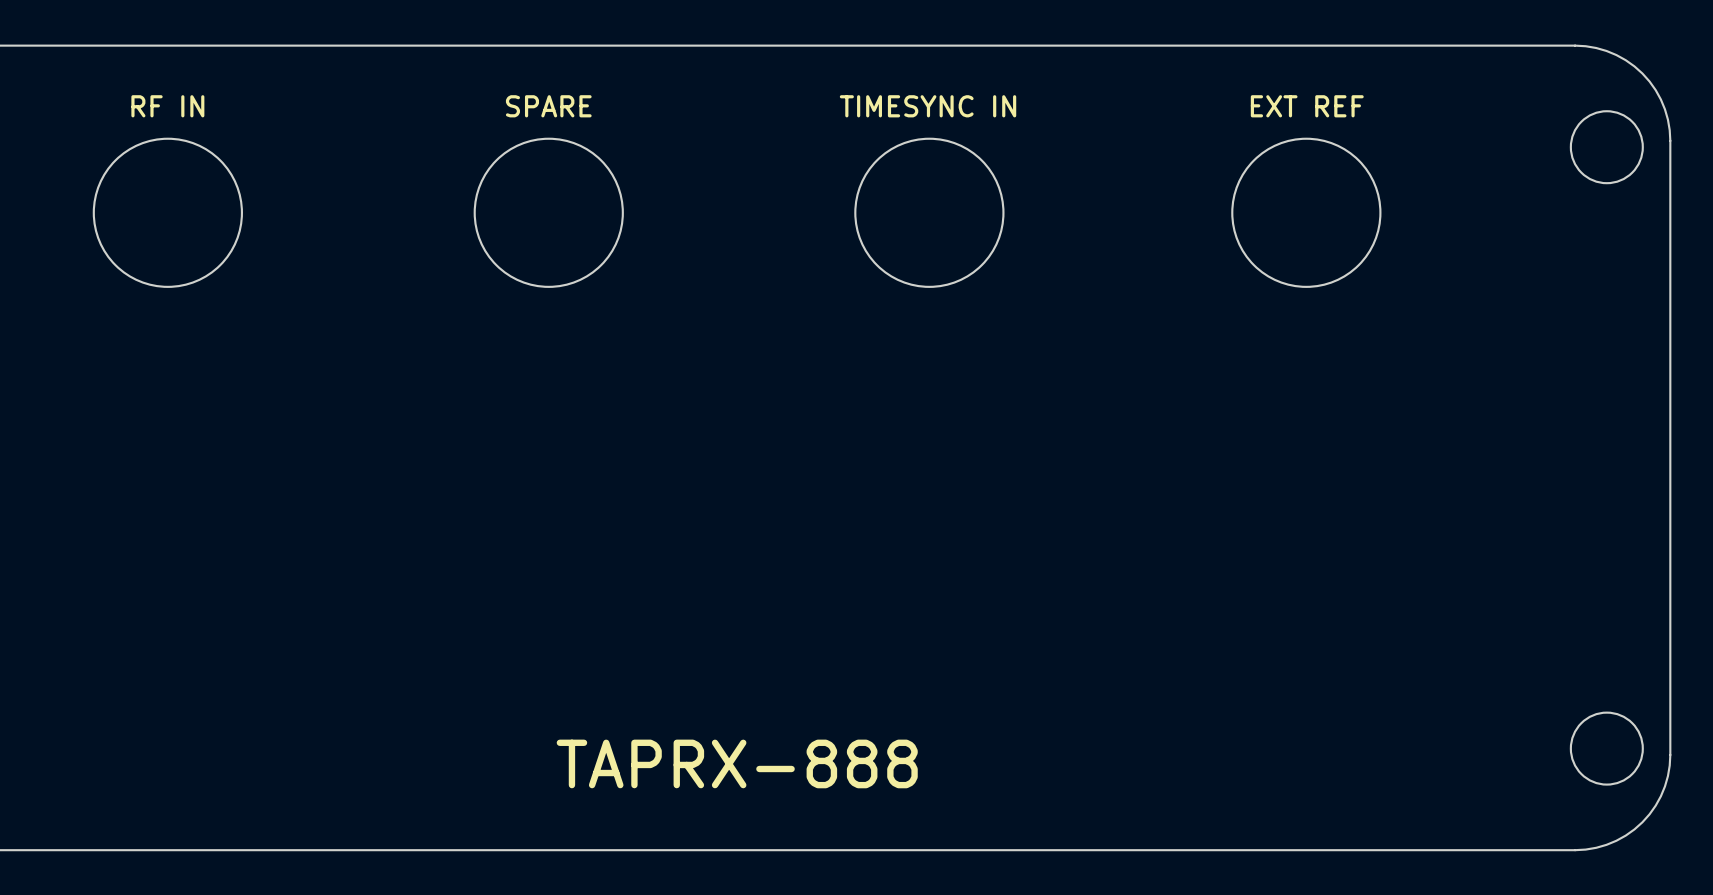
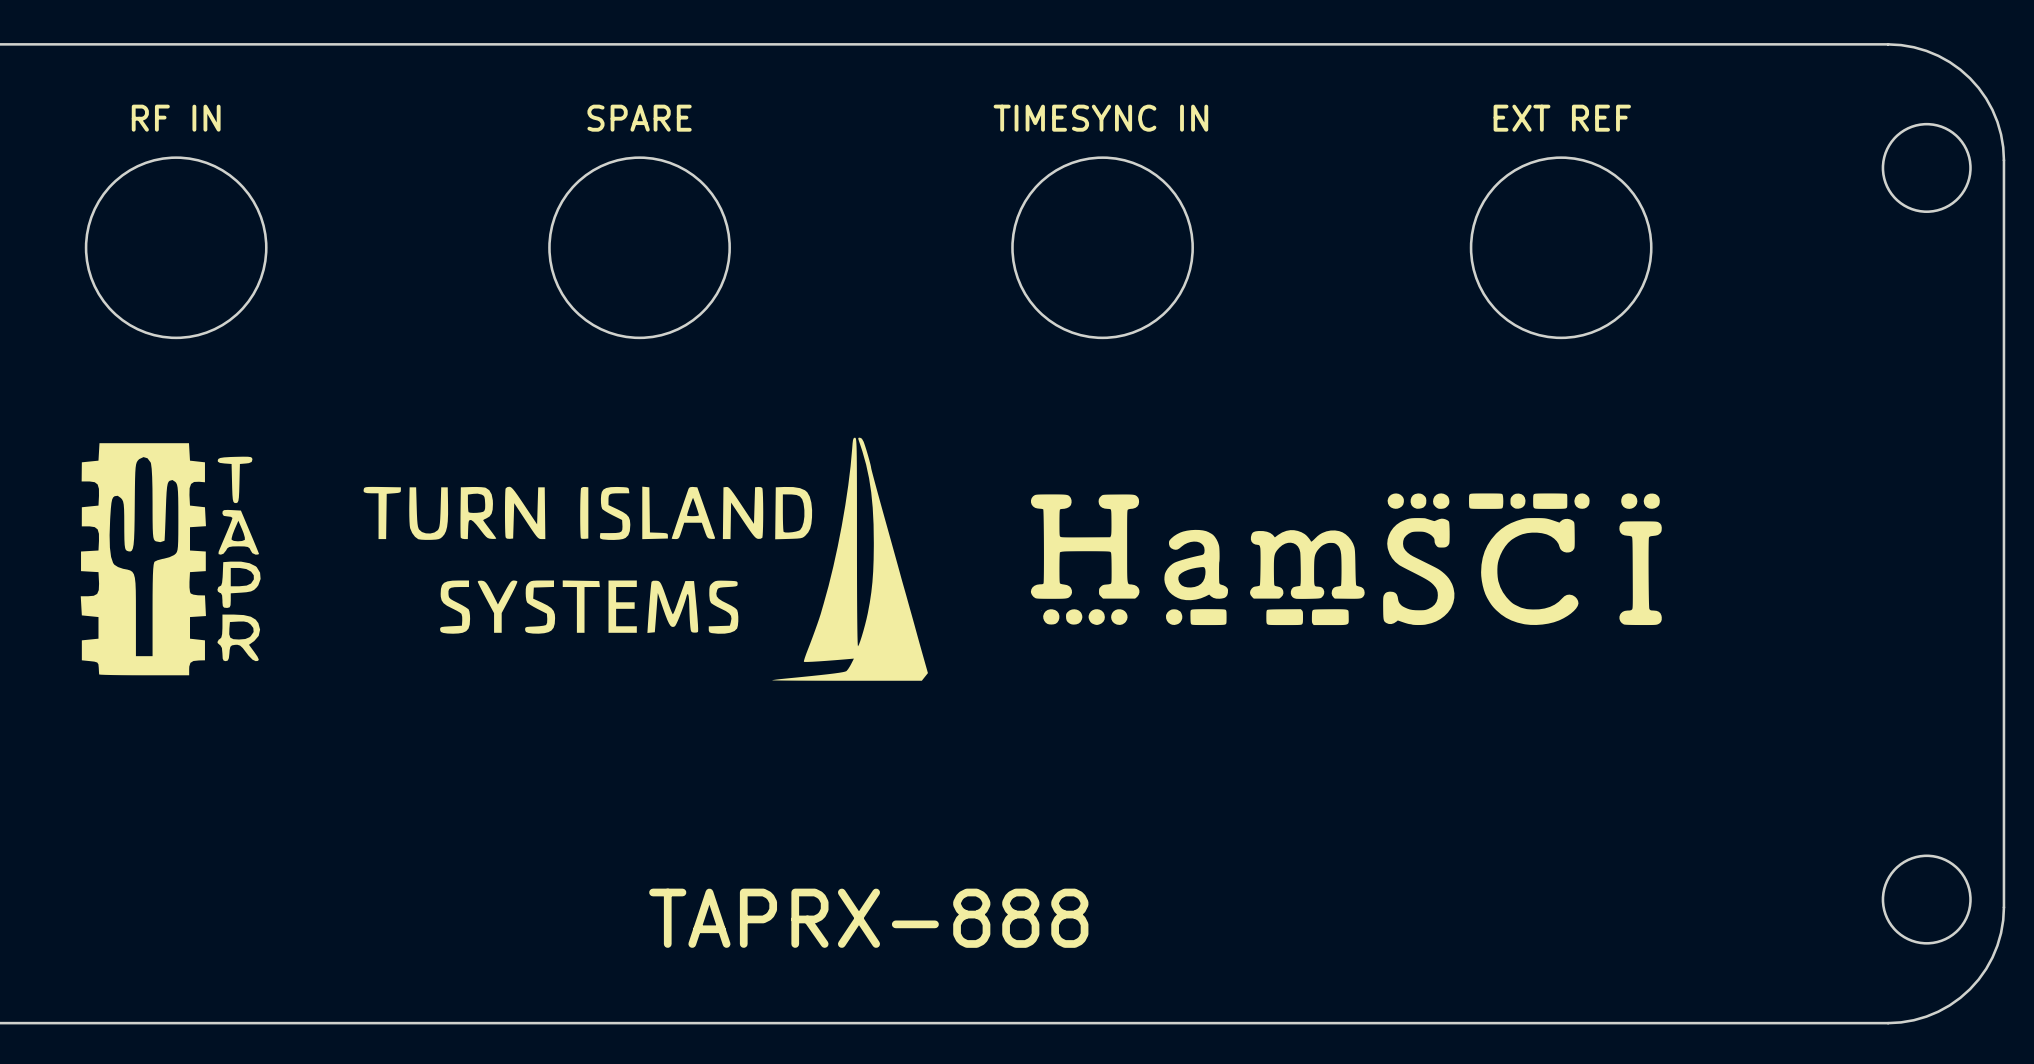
drawing: none -> [580, 437, 928, 681]
drawing: none -> [80, 443, 261, 676]
drawing: none -> [363, 486, 546, 540]
drawing: none -> [1030, 493, 1590, 626]
drawing: none -> [1619, 493, 1662, 626]
drawing: none -> [440, 580, 739, 634]

